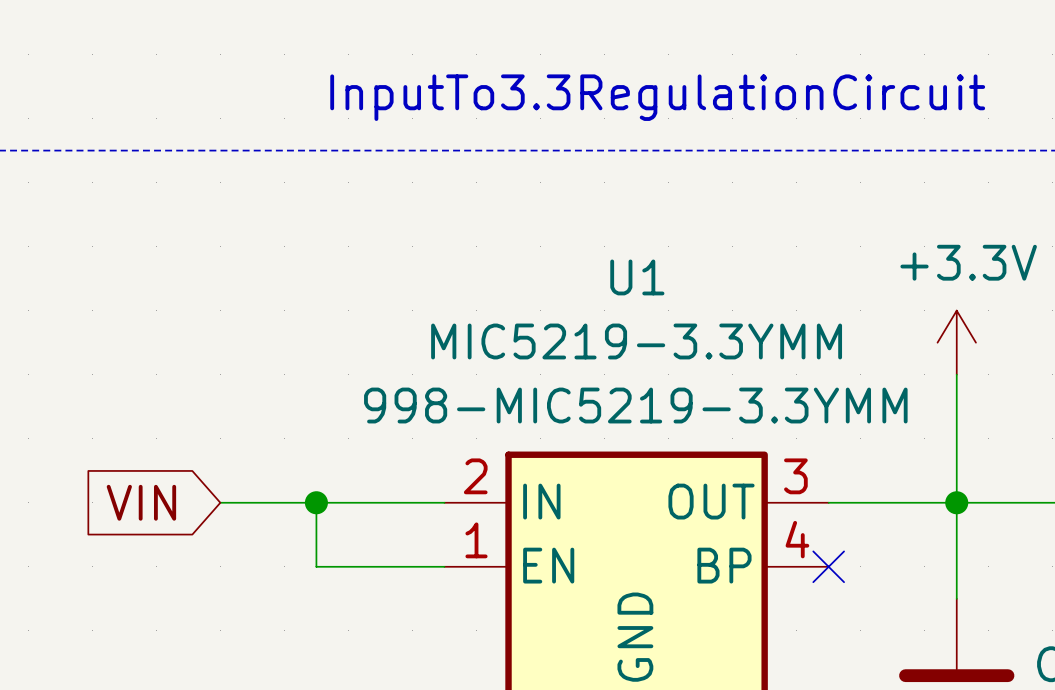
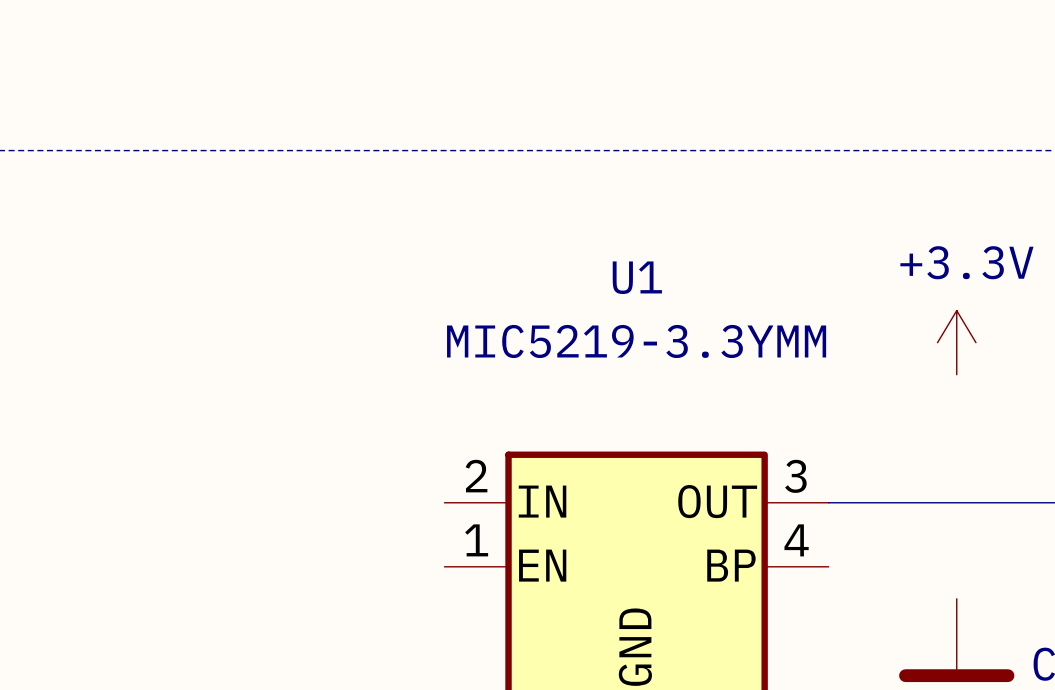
text: InputTo3.3RegulationCircuit (657, 97) -> none
wire: (956, 374) (956, 598) -> none
U1 text: 998-MIC5219-3.3YMM (635, 405) -> none
global label: VIN (141, 502) -> none
wire: (220, 502) (444, 502) -> none
wire: (316, 502) (316, 566) (444, 566) -> none
junction: (316, 502) -> none
junction: (956, 502) -> none
no-connect mark: (828, 566) -> none

